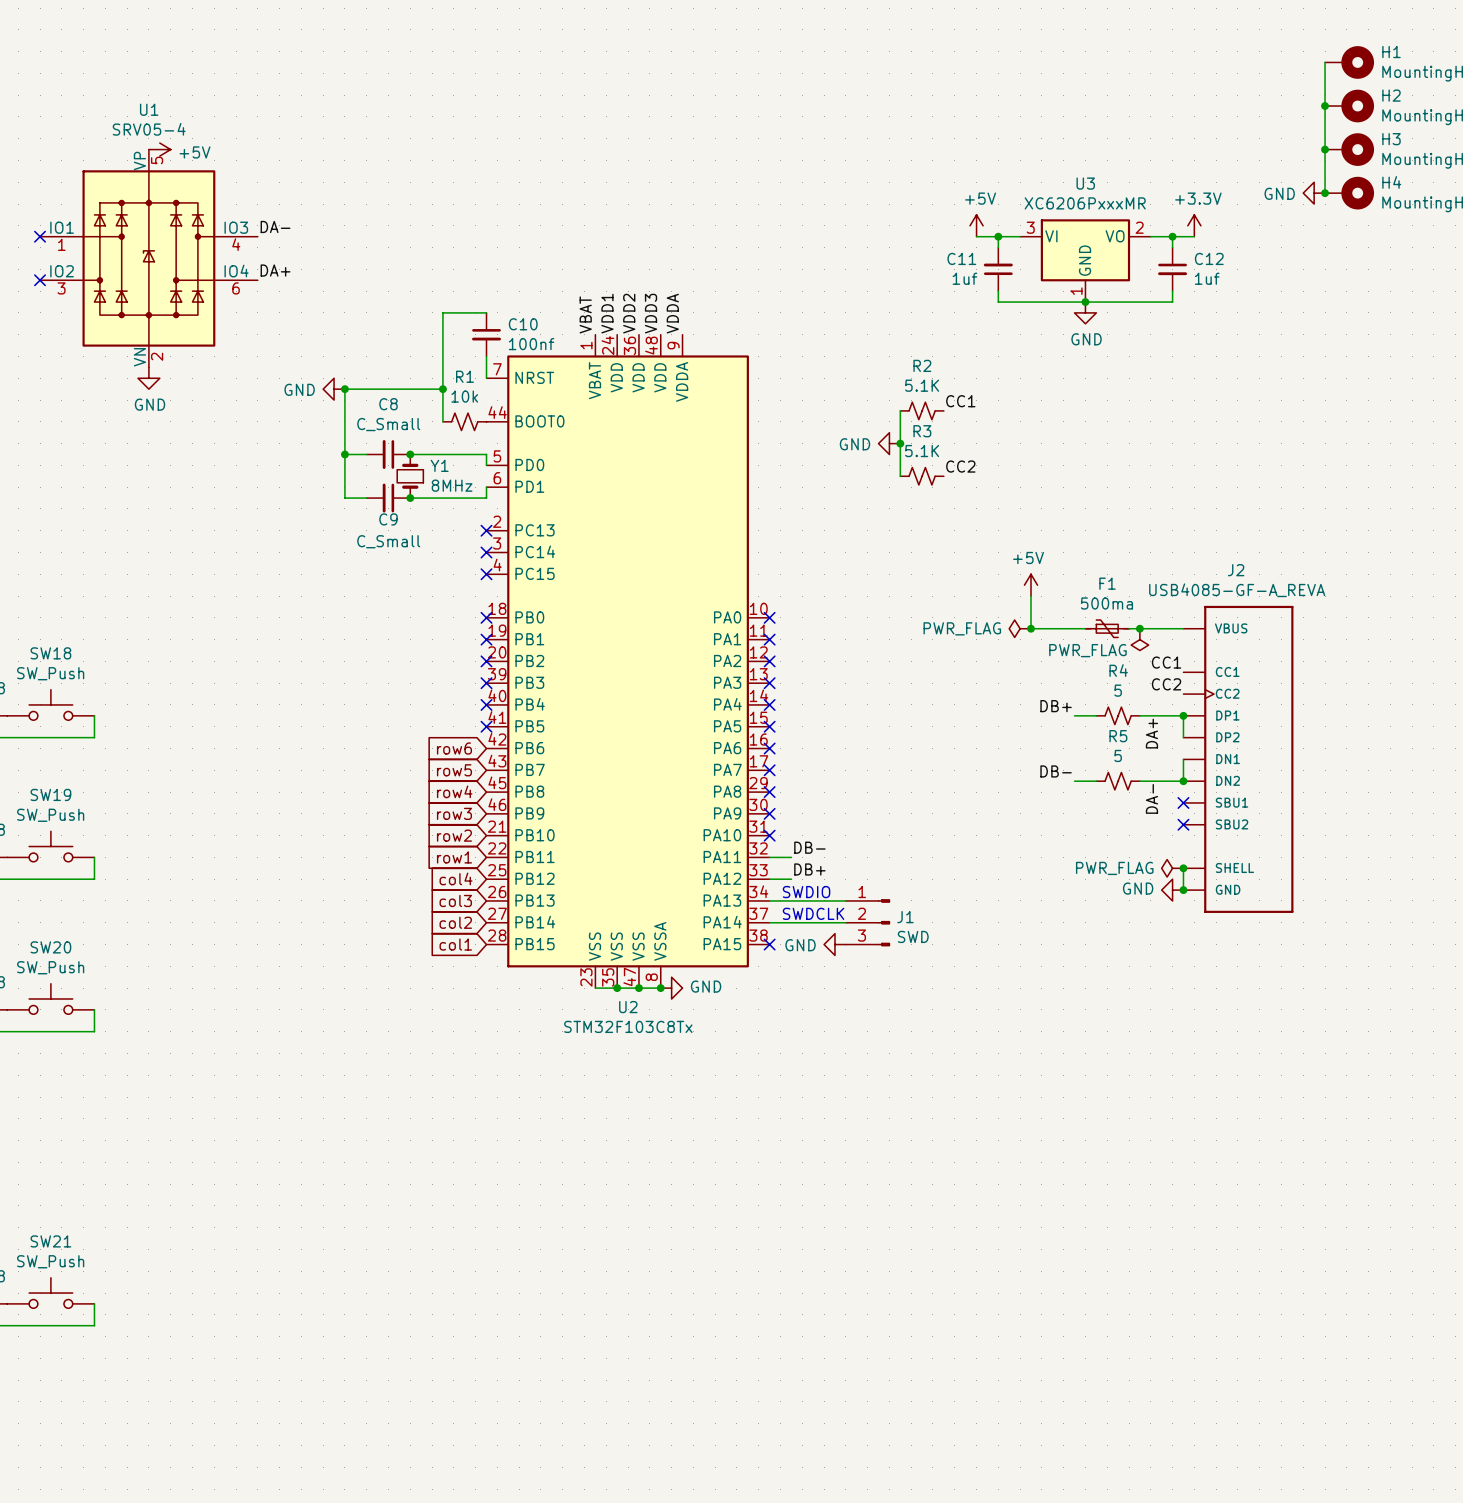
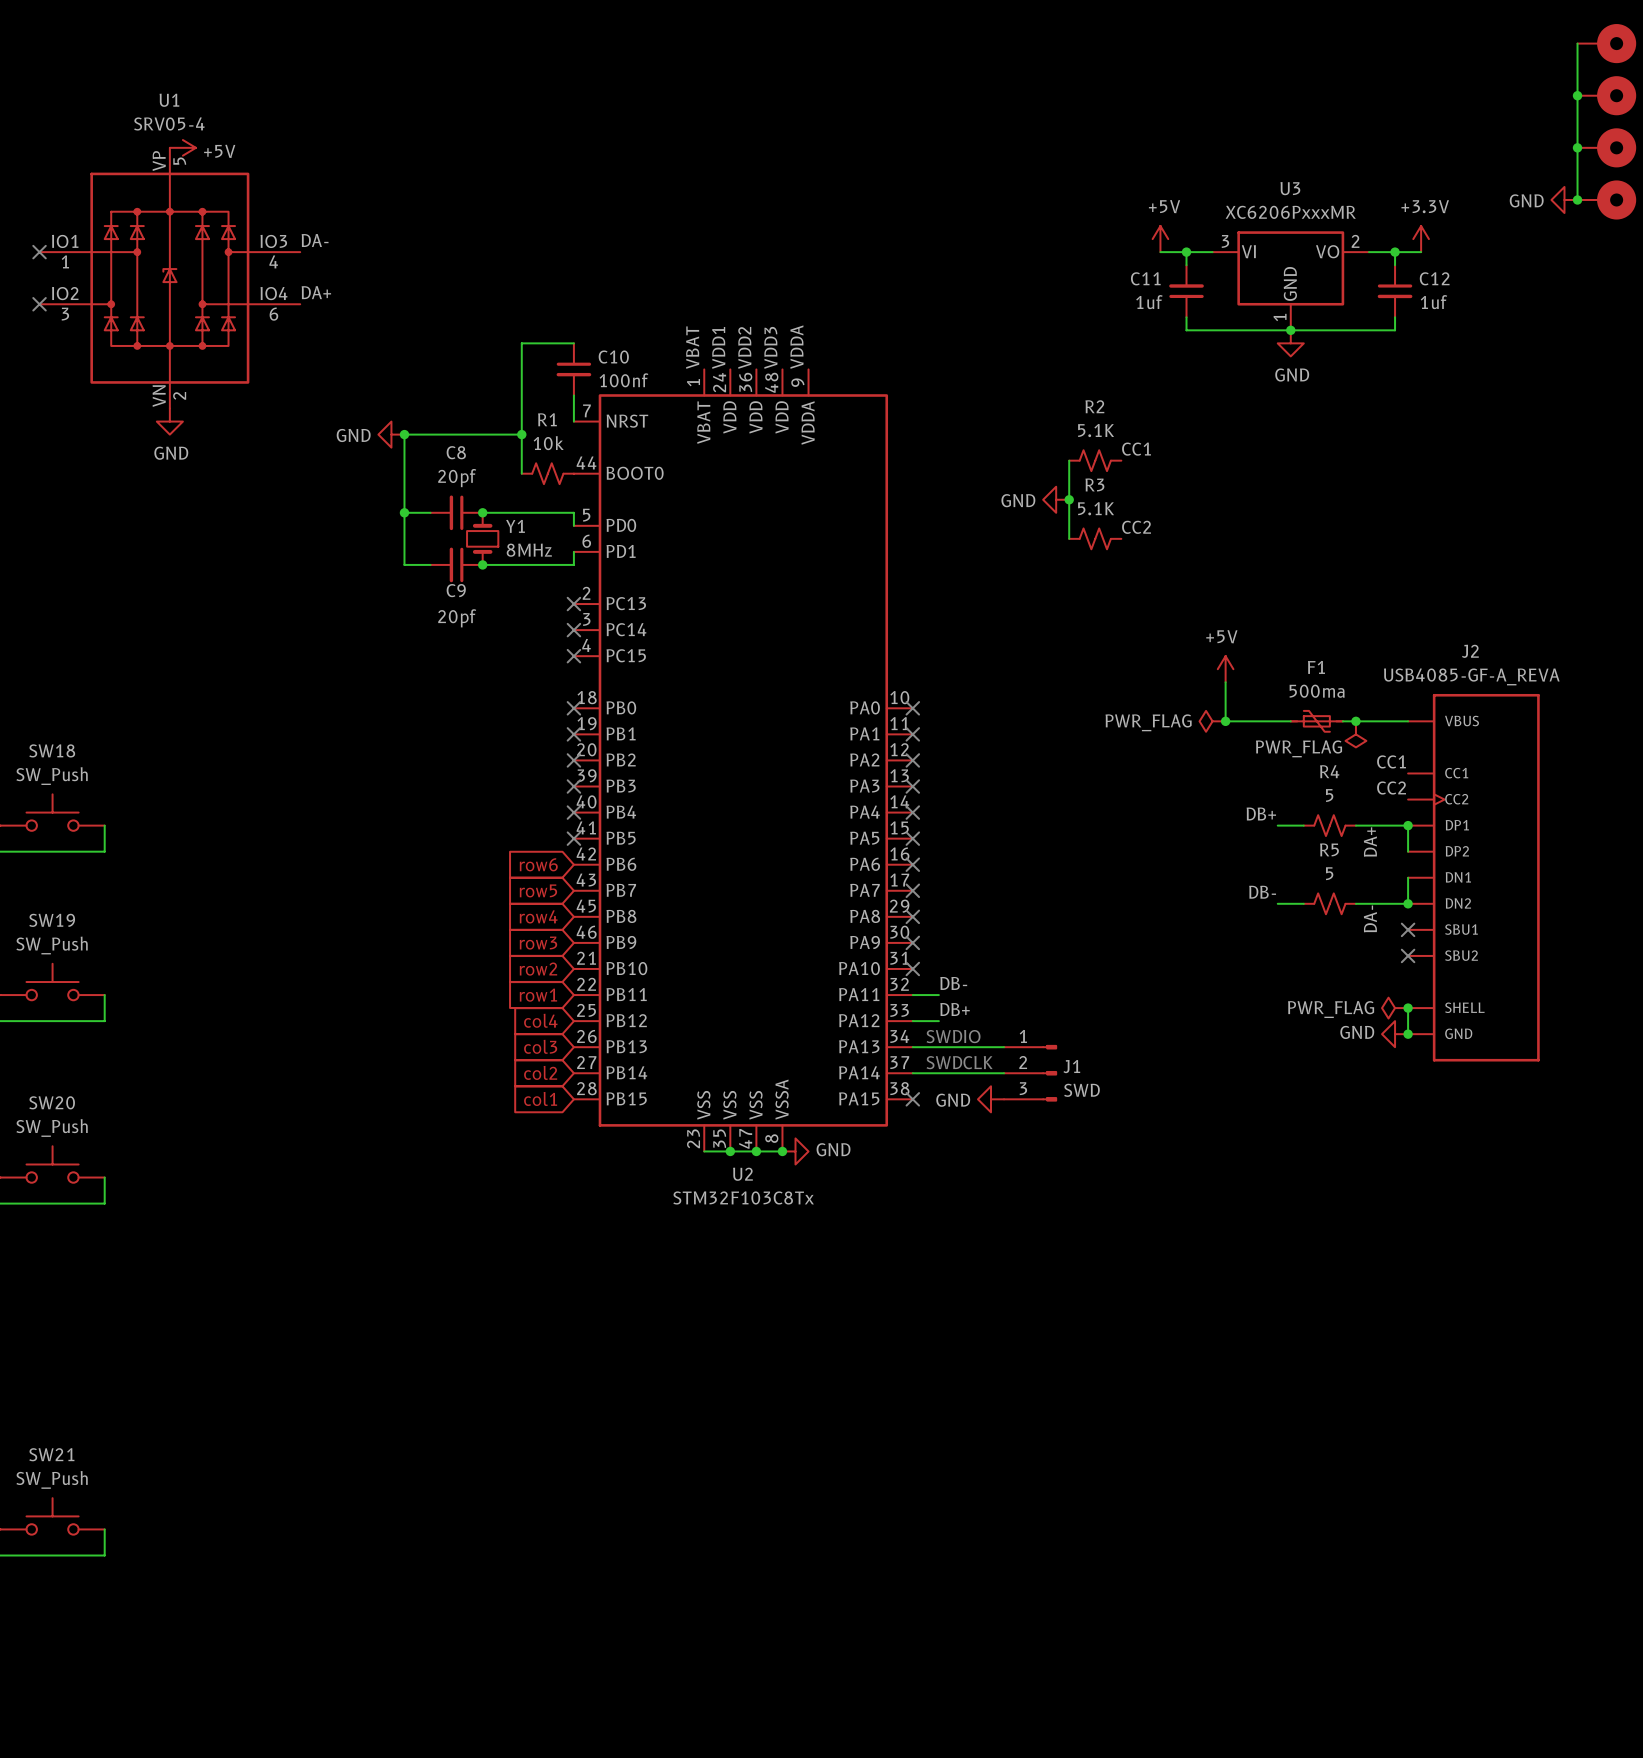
C8 value: C_Small (388, 424) -> 20pf (457, 478)
C9 value: C_Small (388, 541) -> 20pf (457, 618)

